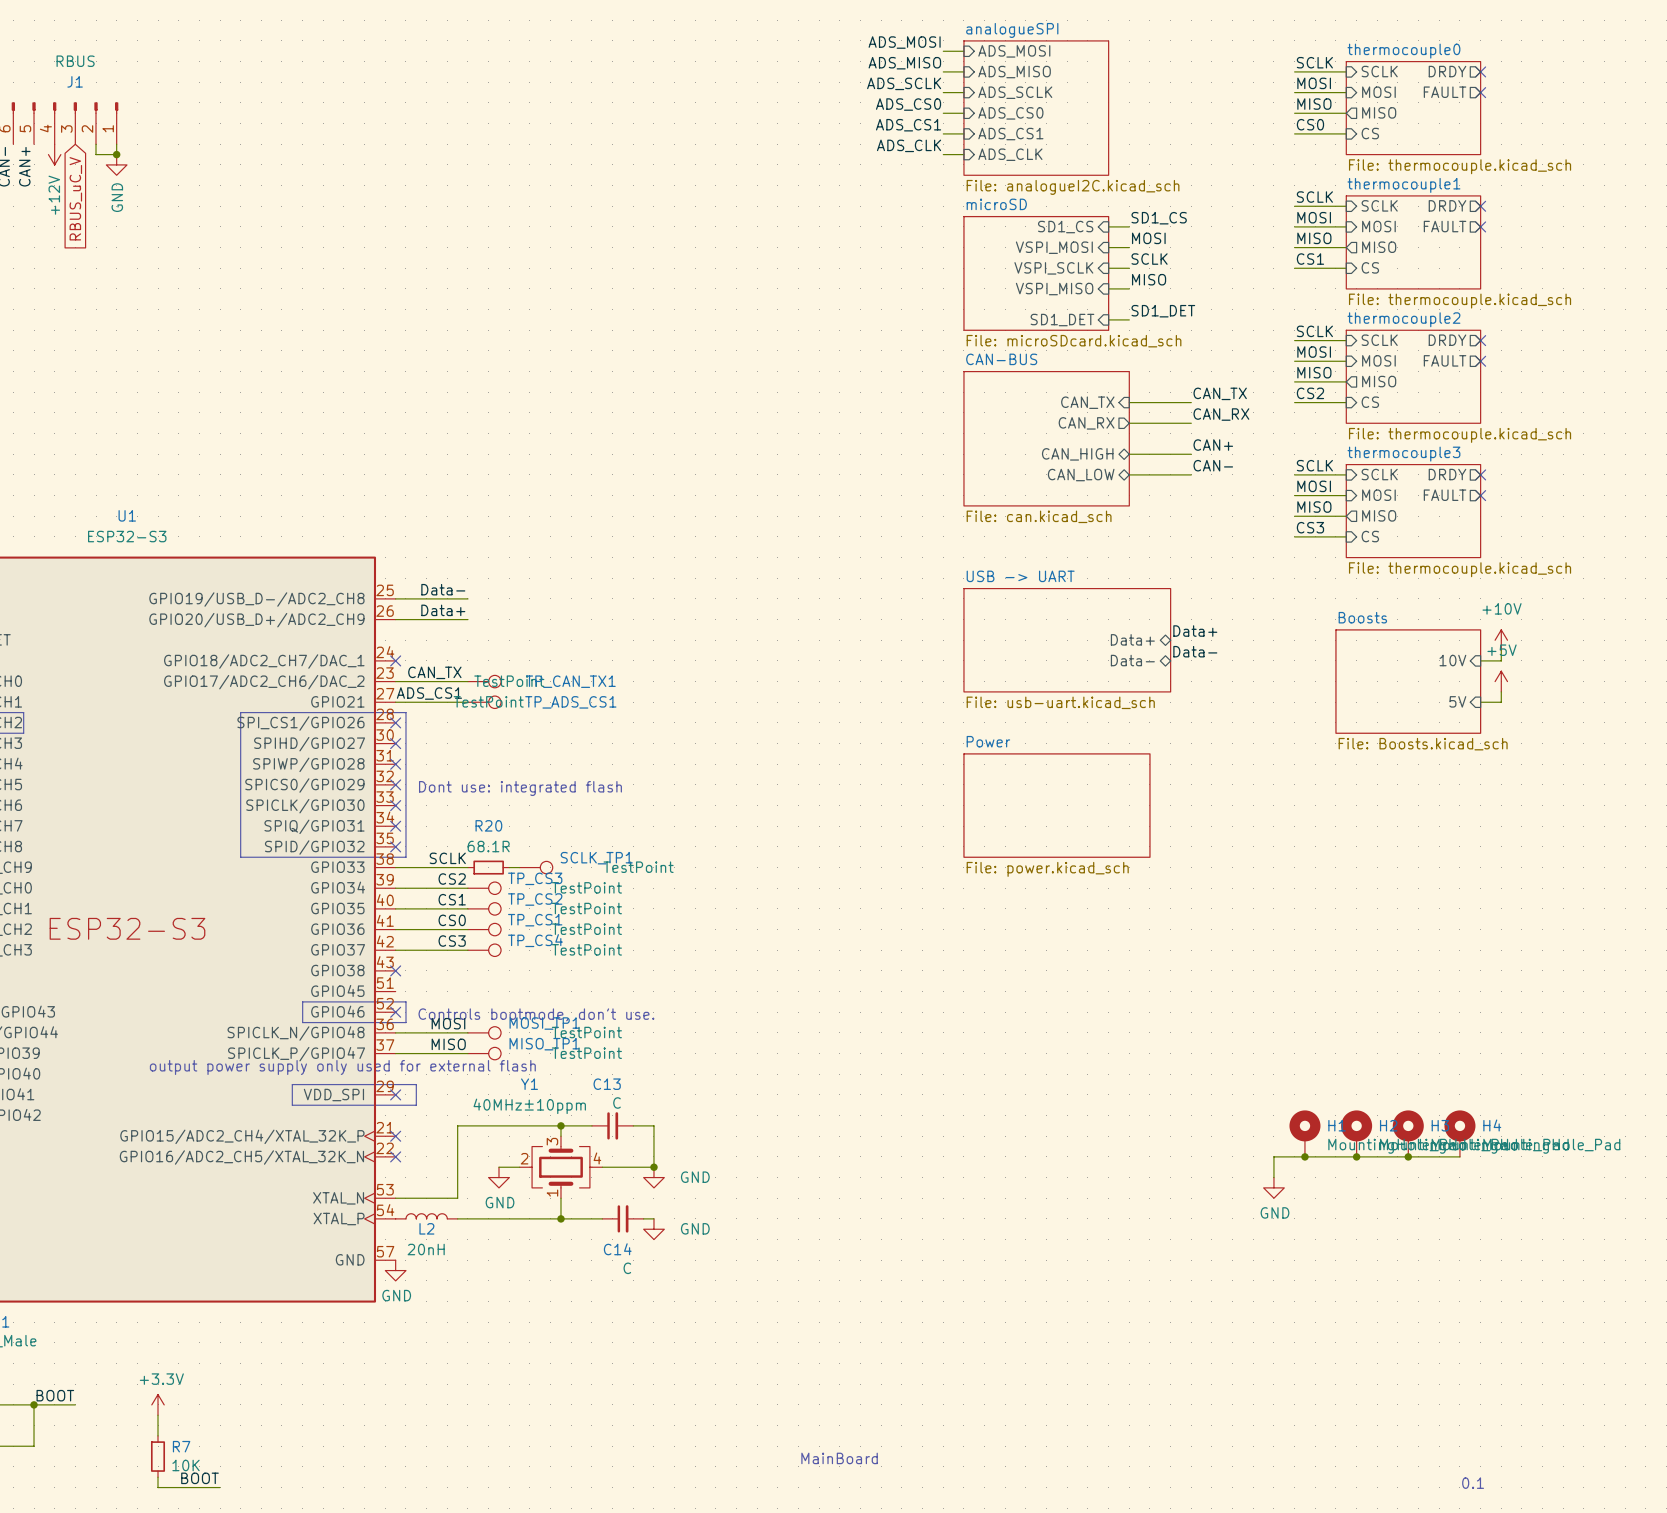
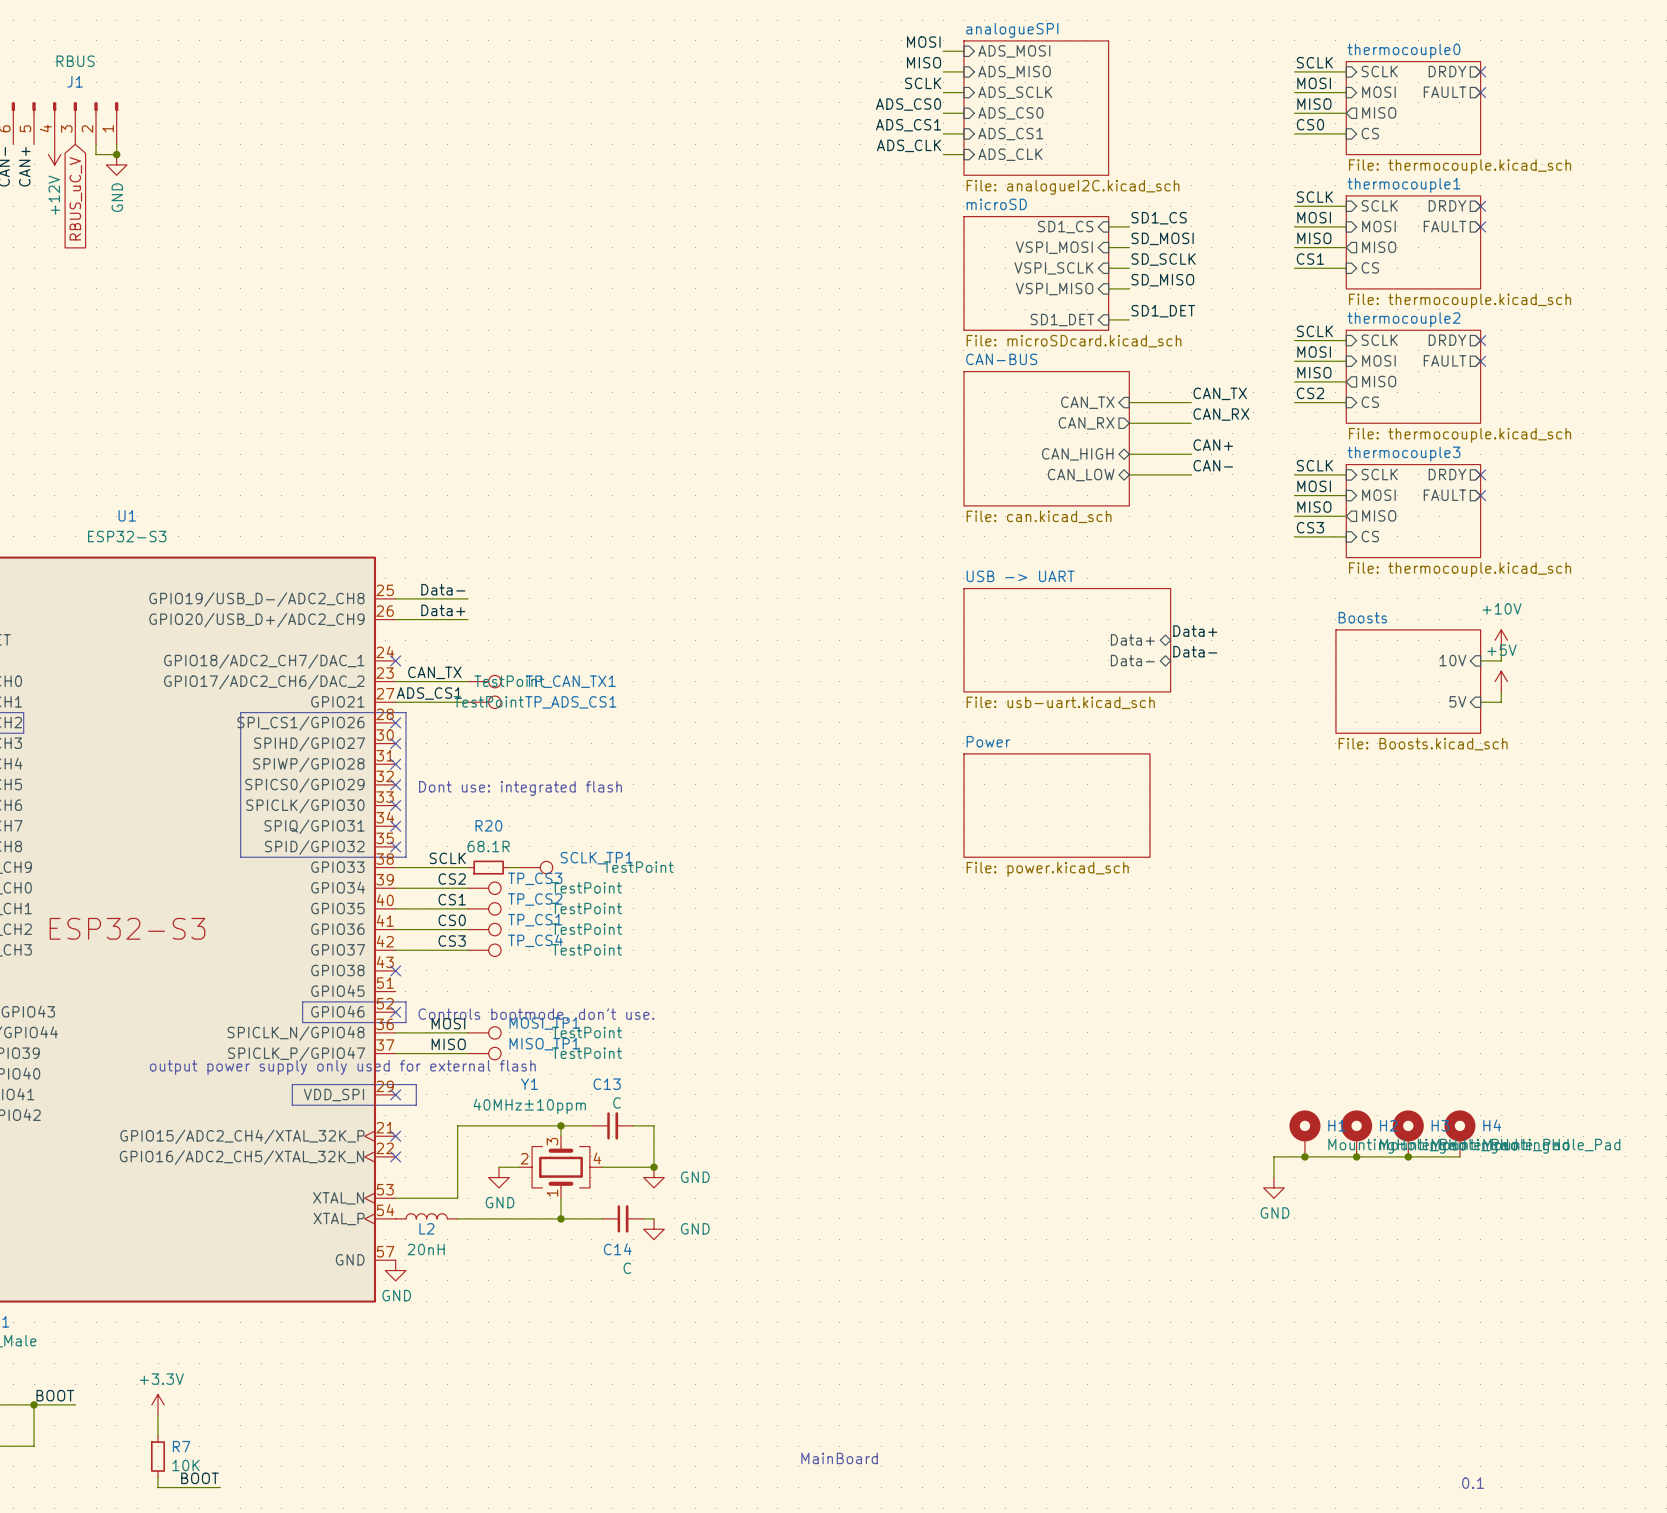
label: ADS_MOSI (904, 42) -> MOSI (923, 42)
label: ADS_MISO (904, 63) -> MISO (924, 62)
label: ADS_SCLK (904, 83) -> SCLK (923, 83)
label: MOSI (1148, 238) -> SD_MOSI (1162, 238)
label: SCLK (1149, 259) -> SD_SCLK (1163, 259)
label: MISO (1149, 279) -> SD_MISO (1162, 280)

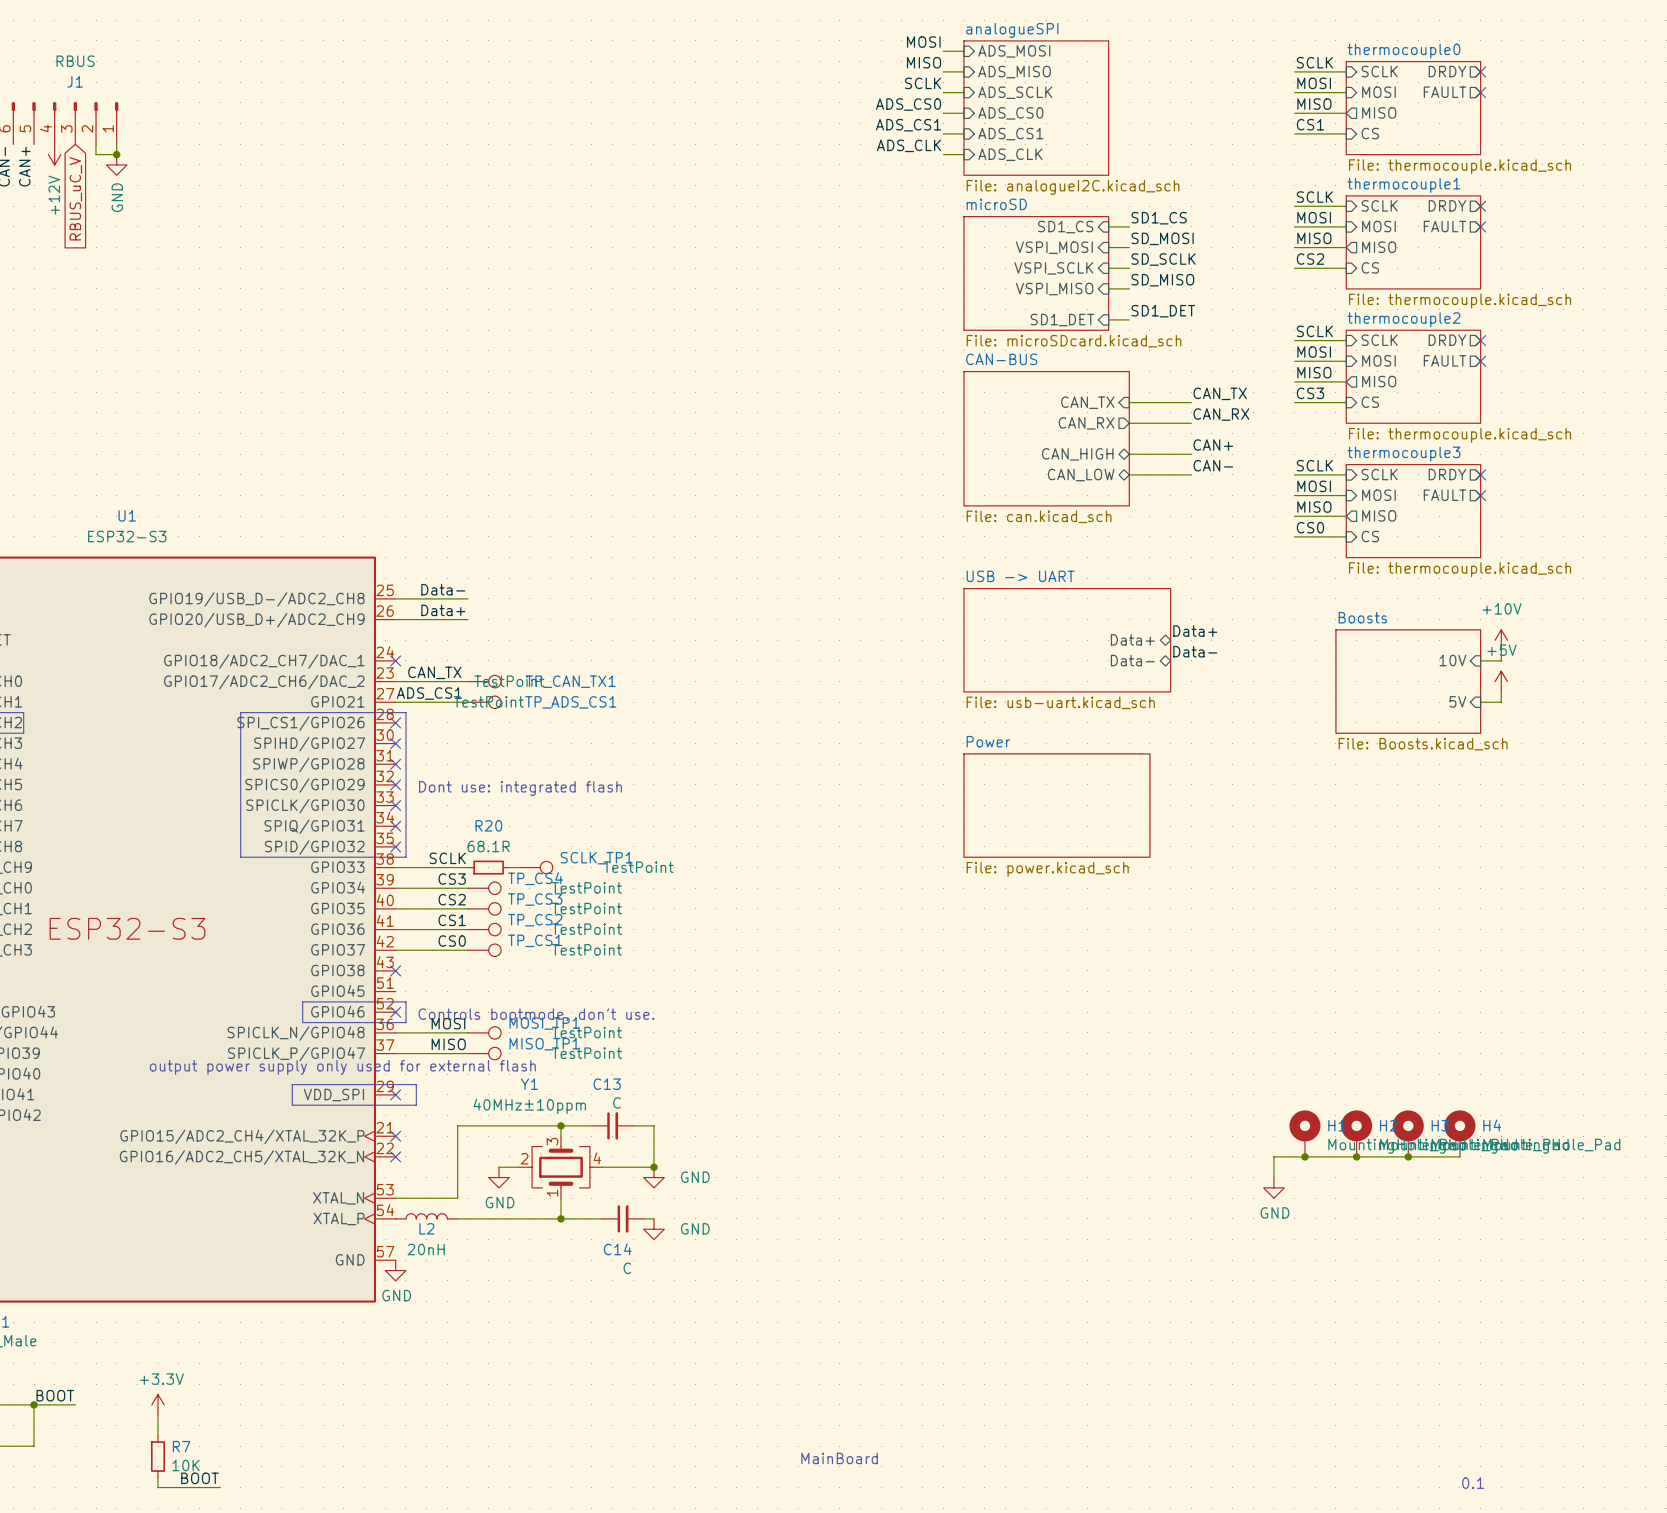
label: CS0 (1310, 124) -> CS1 (1310, 124)
label: CS1 (1310, 259) -> CS2 (1310, 259)
label: CS2 (1310, 393) -> CS3 (1310, 393)
label: CS3 (1310, 527) -> CS0 (1310, 527)
TP_CS3 name: TP_CS3 (535, 878) -> TP_CS4 (535, 878)
label: CS2 (452, 879) -> CS3 (452, 879)
label: CS1 (452, 899) -> CS2 (452, 899)
TP_CS2 name: TP_CS2 (535, 899) -> TP_CS3 (535, 899)
label: CS0 (452, 920) -> CS1 (452, 920)
TP_CS1 name: TP_CS1 (535, 920) -> TP_CS2 (535, 920)
TP_CS4 name: TP_CS4 (535, 940) -> TP_CS1 (535, 940)
label: CS3 (452, 941) -> CS0 (452, 941)

